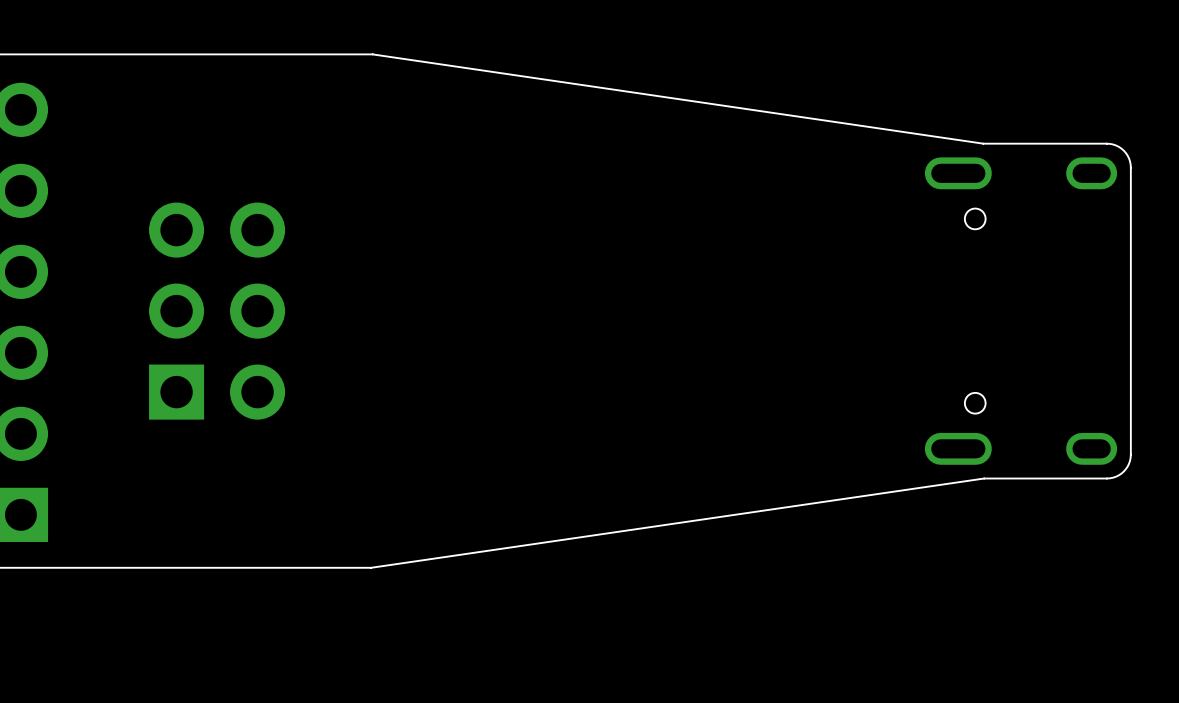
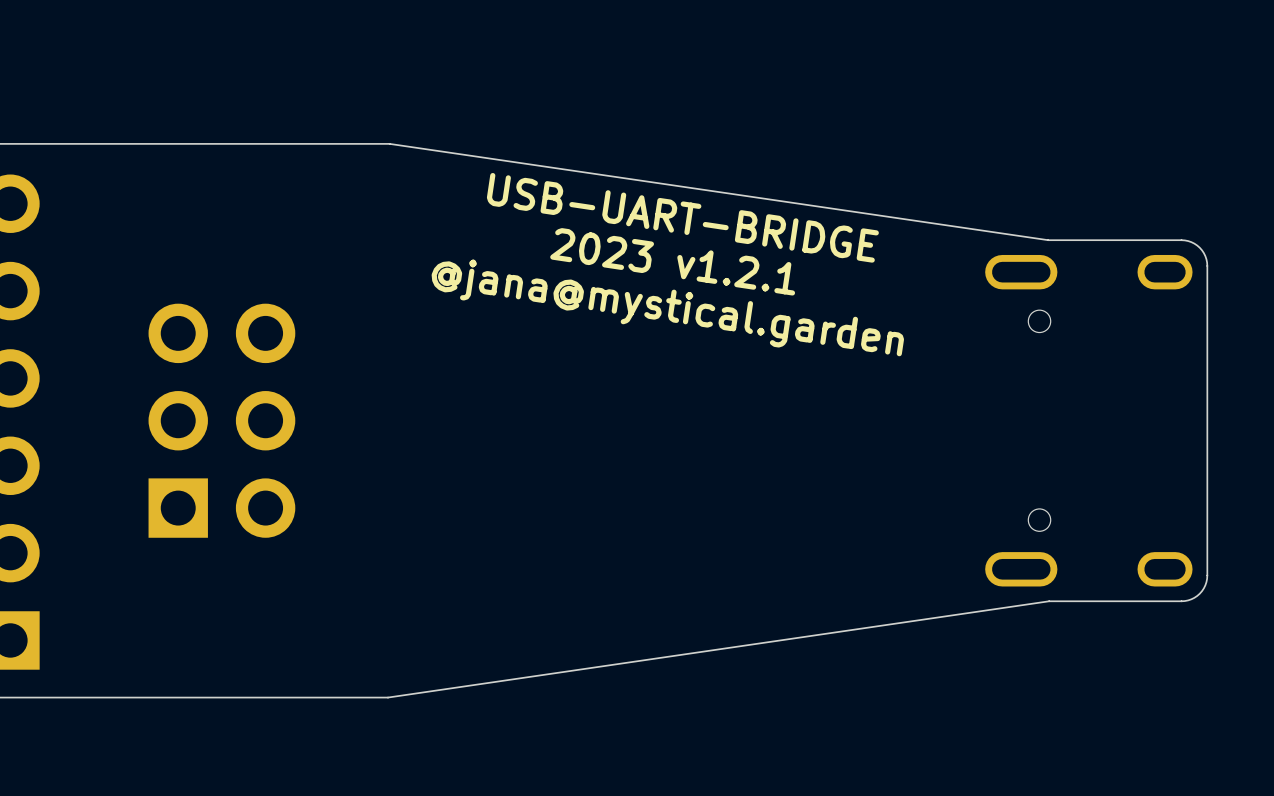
text: none -> USB-UART-BRIDGE (682, 217)
text: none -> 2023 v1.2.1 (672, 261)
text: none -> @jana@mystical.garden (667, 307)

